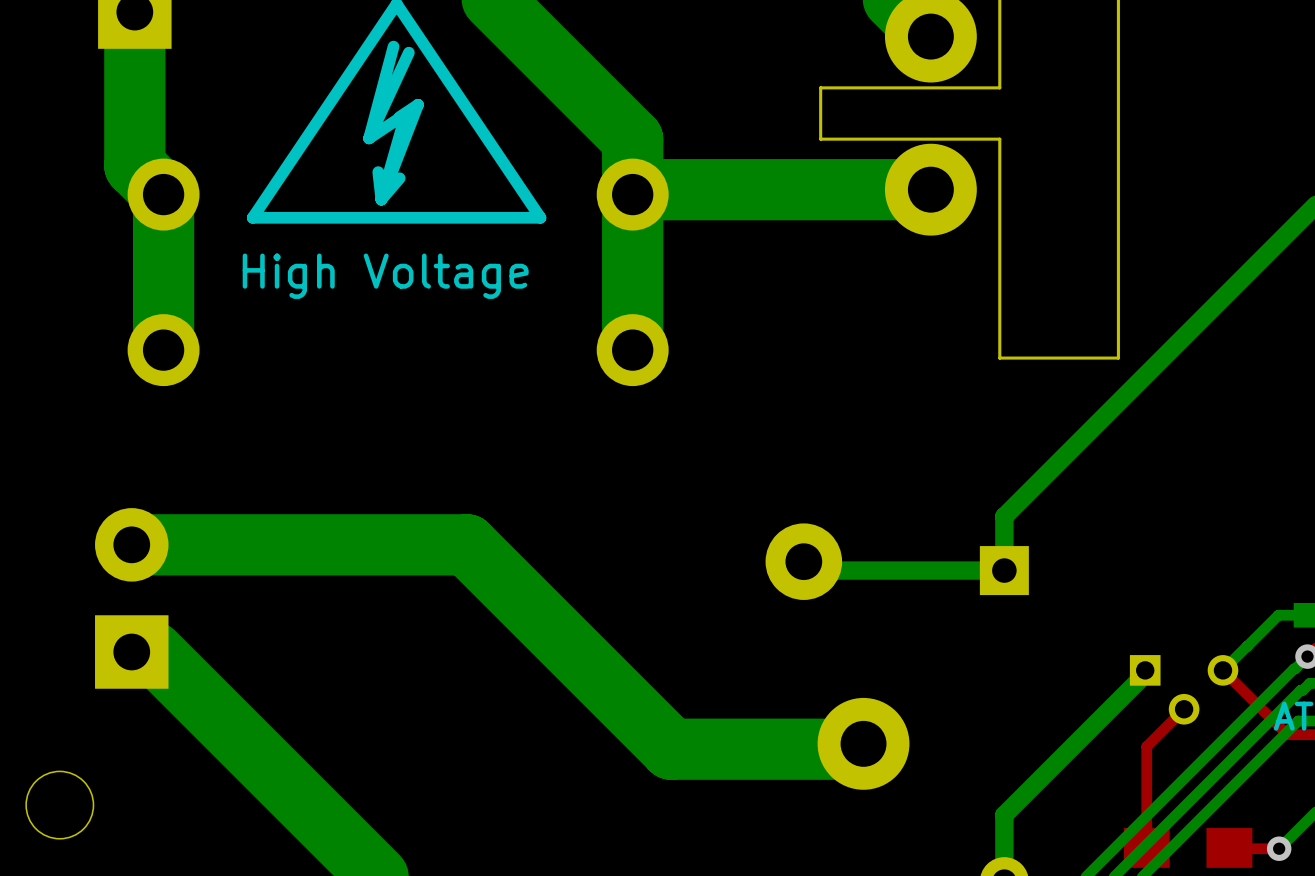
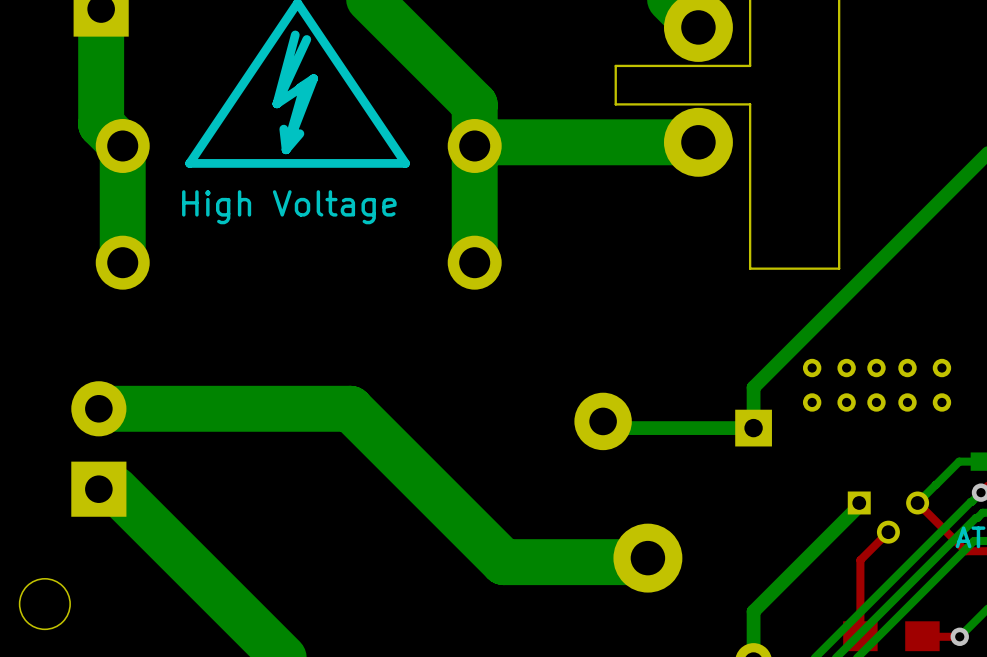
part: none -> (812, 368)
part: none -> (846, 368)
part: none -> (876, 368)
part: none -> (907, 368)
part: none -> (941, 368)
part: none -> (812, 402)
part: none -> (846, 402)
part: none -> (876, 402)
part: none -> (907, 402)
part: none -> (941, 402)

